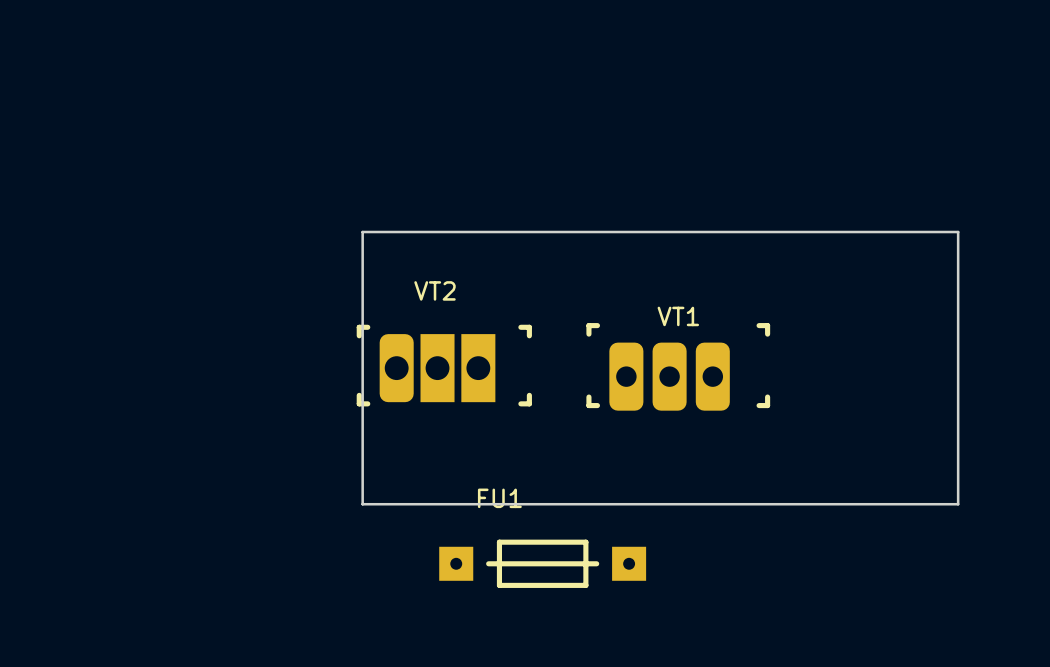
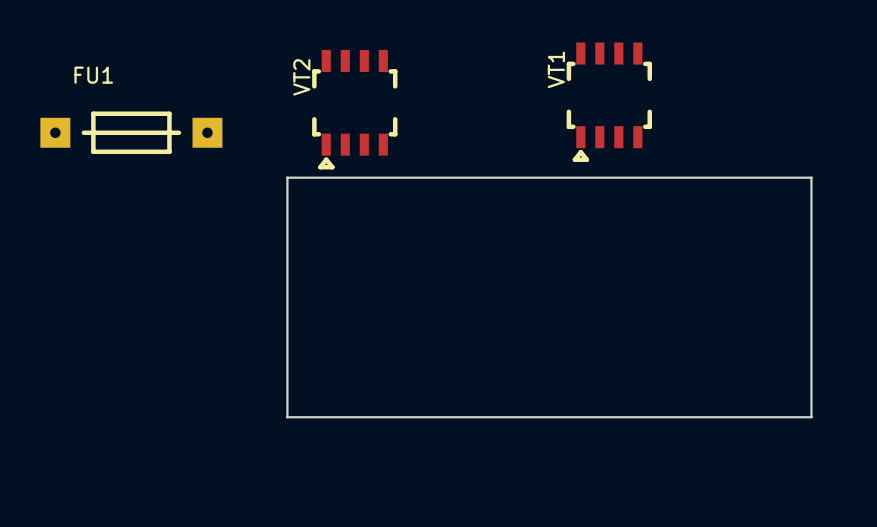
VT2 name position: VT2 (435, 290) -> VT2 (301, 77)
VT1 name position: VT1 (678, 316) -> VT1 (556, 69)
VT1 footprint: [586, 323, 771, 411] -> [566, 42, 652, 162]
VT2 footprint: [356, 324, 532, 407] -> [312, 49, 398, 170]
FU1 position: (542, 563) -> (131, 132)

